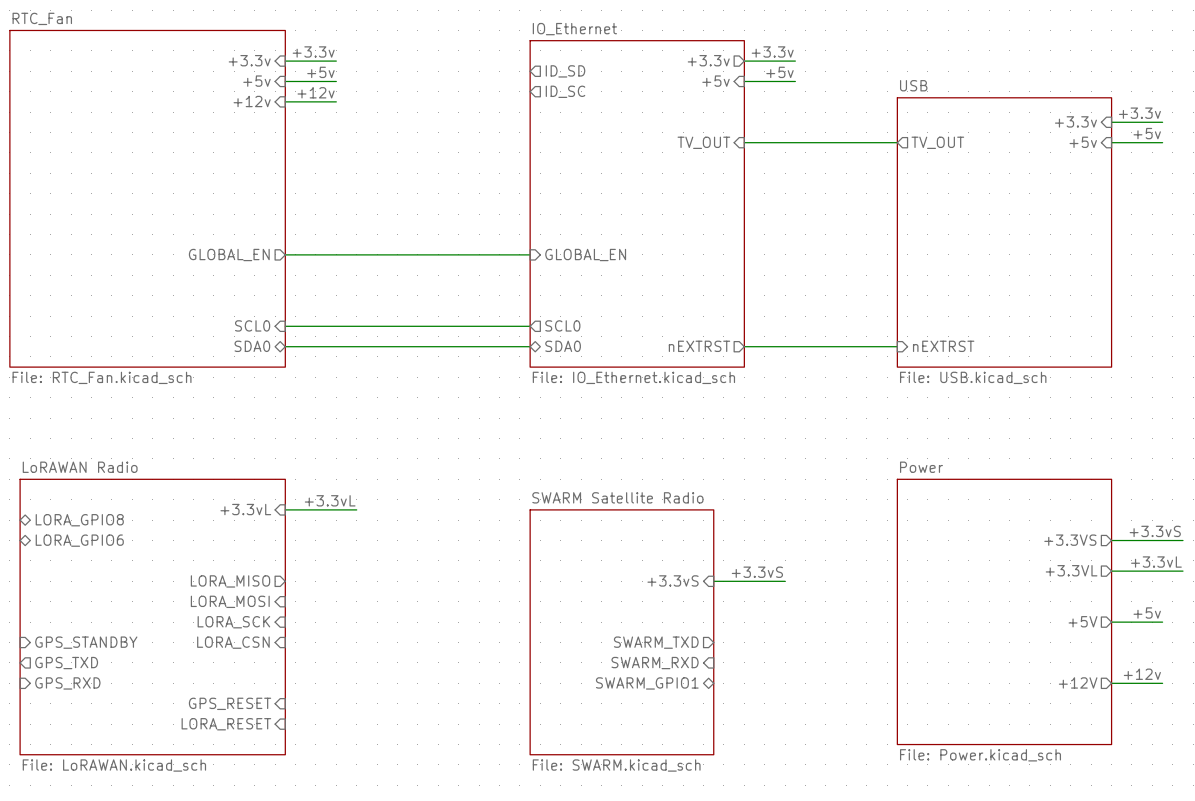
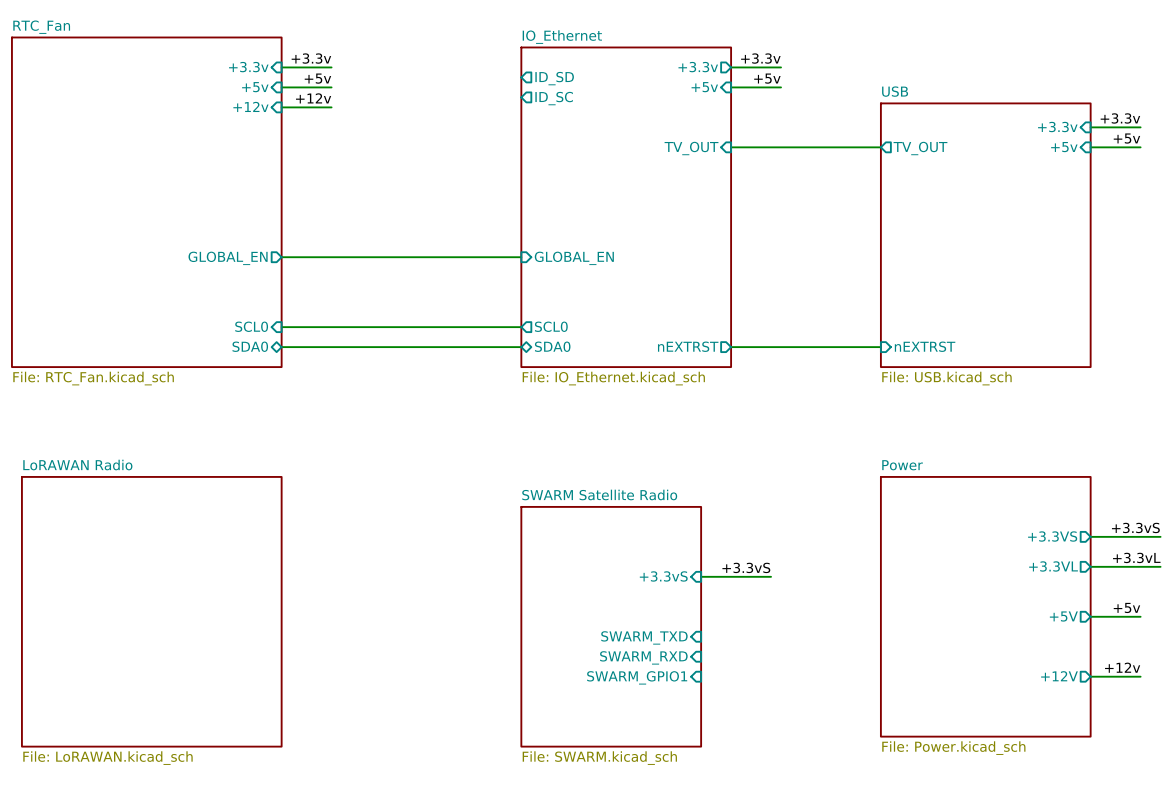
label: +3.3vL (330, 500) -> none
sheet pin: +3.3vL (245, 509) -> none
wire: (285, 509) (356, 509) -> none
sheet pin: LORA_GPIO8 (79, 520) -> none
sheet pin: LORA_GPIO6 (79, 540) -> none
sheet pin: LORA_MISO (230, 581) -> none
sheet pin: LORA_MOSI (230, 601) -> none
sheet pin: LORA_SCK (233, 622) -> none
sheet pin: GPS_STANDBY (86, 642) -> none
sheet pin: LORA_CSN (233, 642) -> none
sheet pin shape: output (656, 642) -> input (644, 637)
sheet pin: GPS_TXD (66, 663) -> none
sheet pin: GPS_RXD (67, 683) -> none
sheet pin shape: bidirectional (647, 683) -> input (637, 677)
sheet pin: GPS_RESET (230, 703) -> none
sheet pin: LORA_RESET (226, 724) -> none

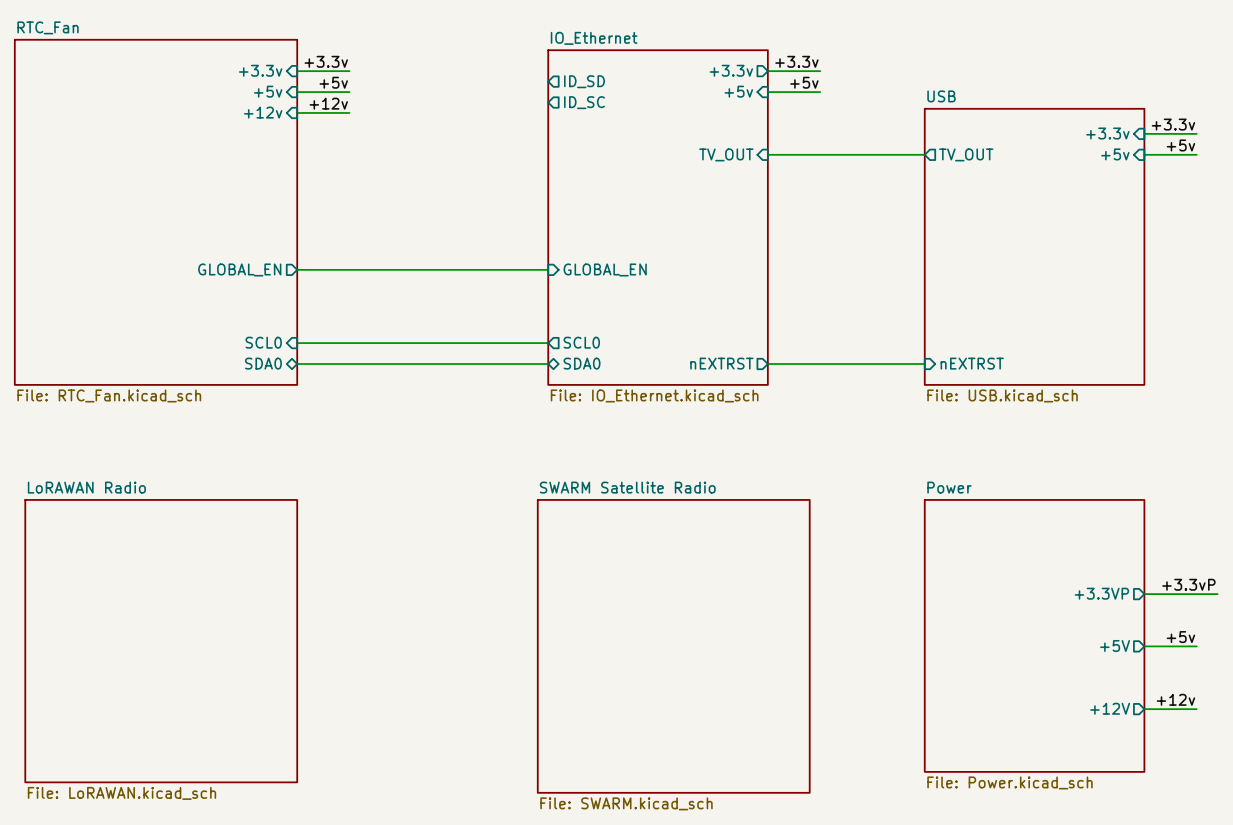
label: +3.3vS (1135, 527) -> none
sheet pin: +3.3VS (1052, 536) -> none
wire: (1090, 536) (1160, 536) -> none
label: +3.3vL (1136, 557) -> +3.3vP (1188, 584)
sheet pin: +3.3VL (1053, 566) -> +3.3VP (1101, 593)
label: +3.3vS (746, 567) -> none
sheet pin: +3.3vS (663, 576) -> none
wire: (701, 576) (771, 576) -> none
sheet SWARM Satellite Radio: none -> File: SWARM.kicad_sch (673, 646)
sheet SWARM Satellite Radio: File: SWARM.kicad_sch (611, 626) -> none
sheet pin: SWARM_TXD (644, 637) -> none
sheet pin: SWARM_RXD (643, 657) -> none
sheet pin: SWARM_GPIO1 (637, 677) -> none

